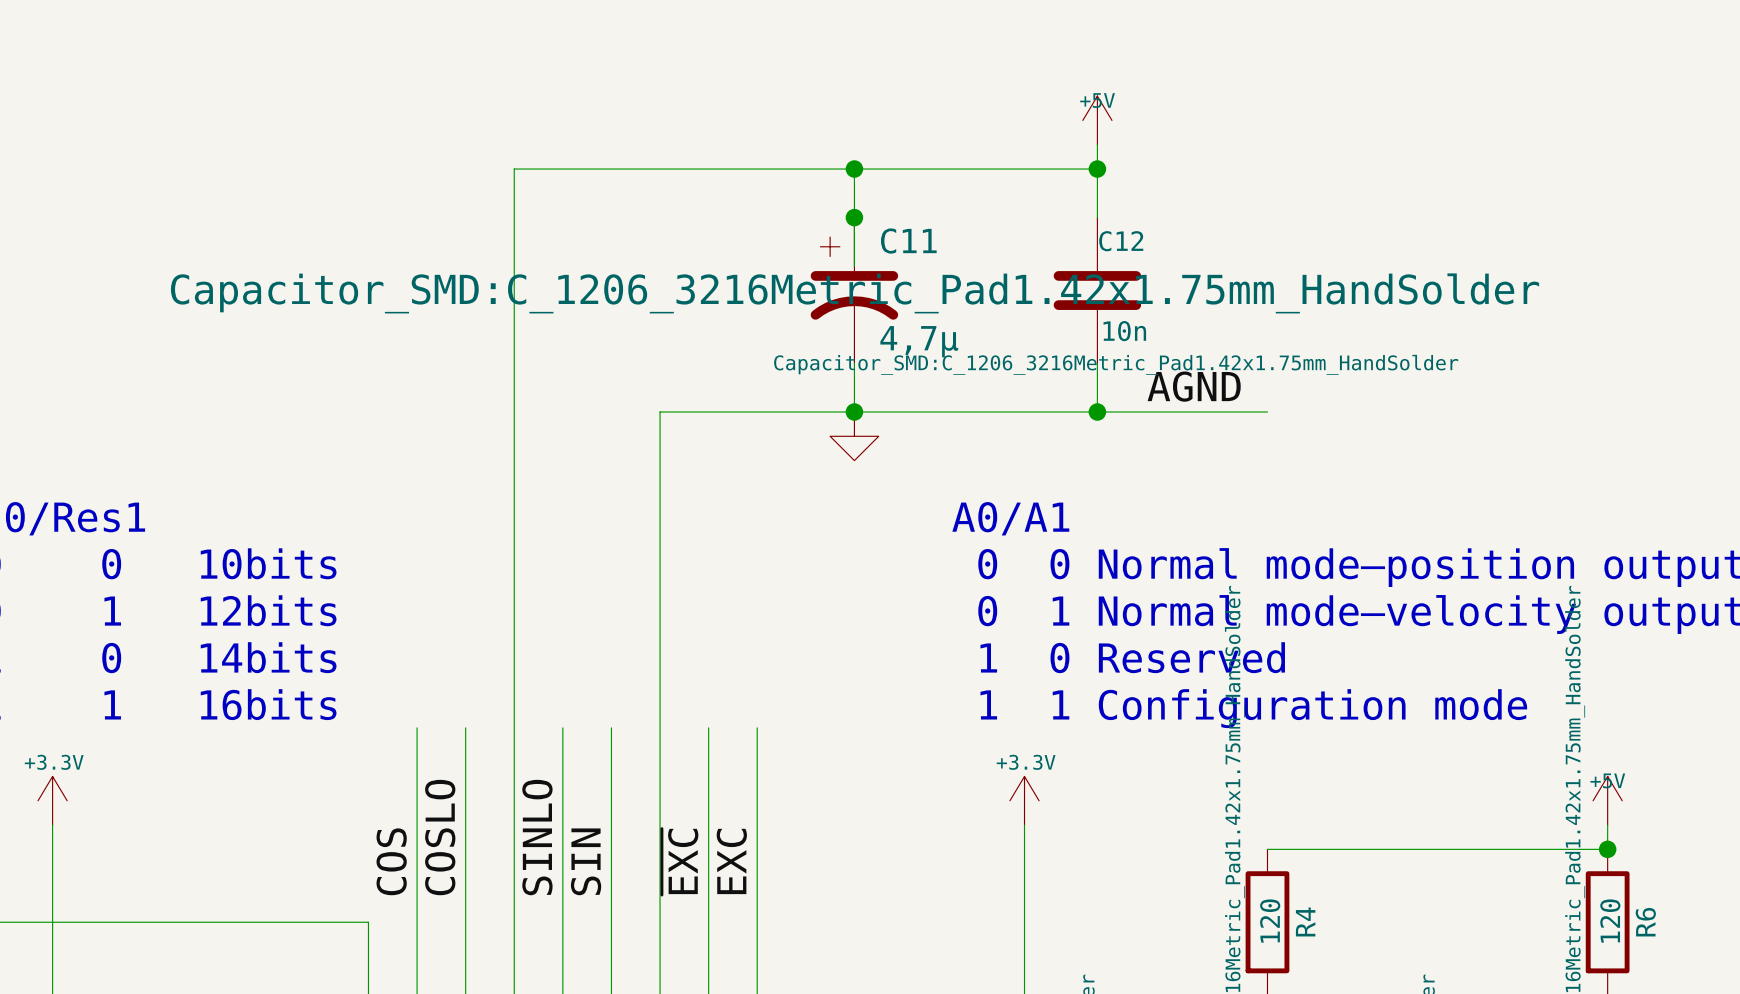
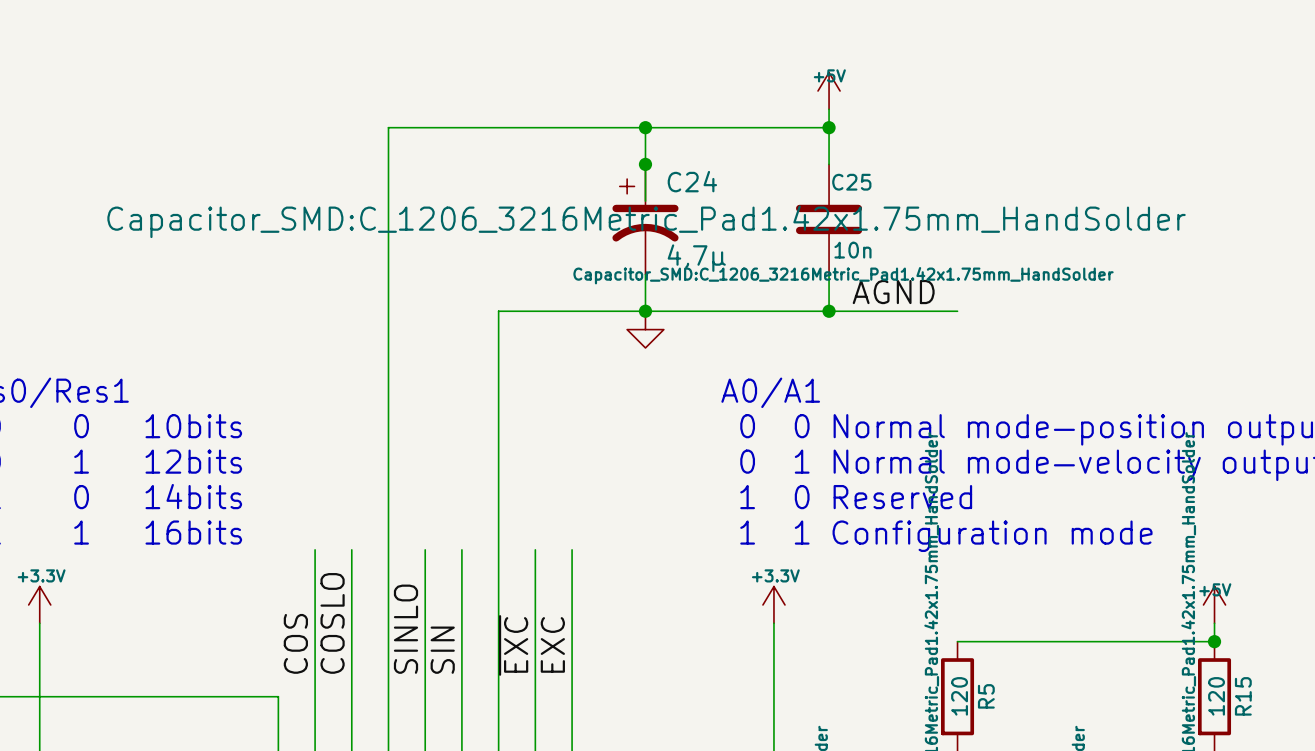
C11 name: C11 (908, 241) -> C24 (692, 181)
C12 name: C12 (1121, 241) -> C25 (851, 182)
R4 name: R4 (1305, 921) -> R5 (986, 696)
R6 name: R6 (1645, 922) -> R15 (1243, 696)

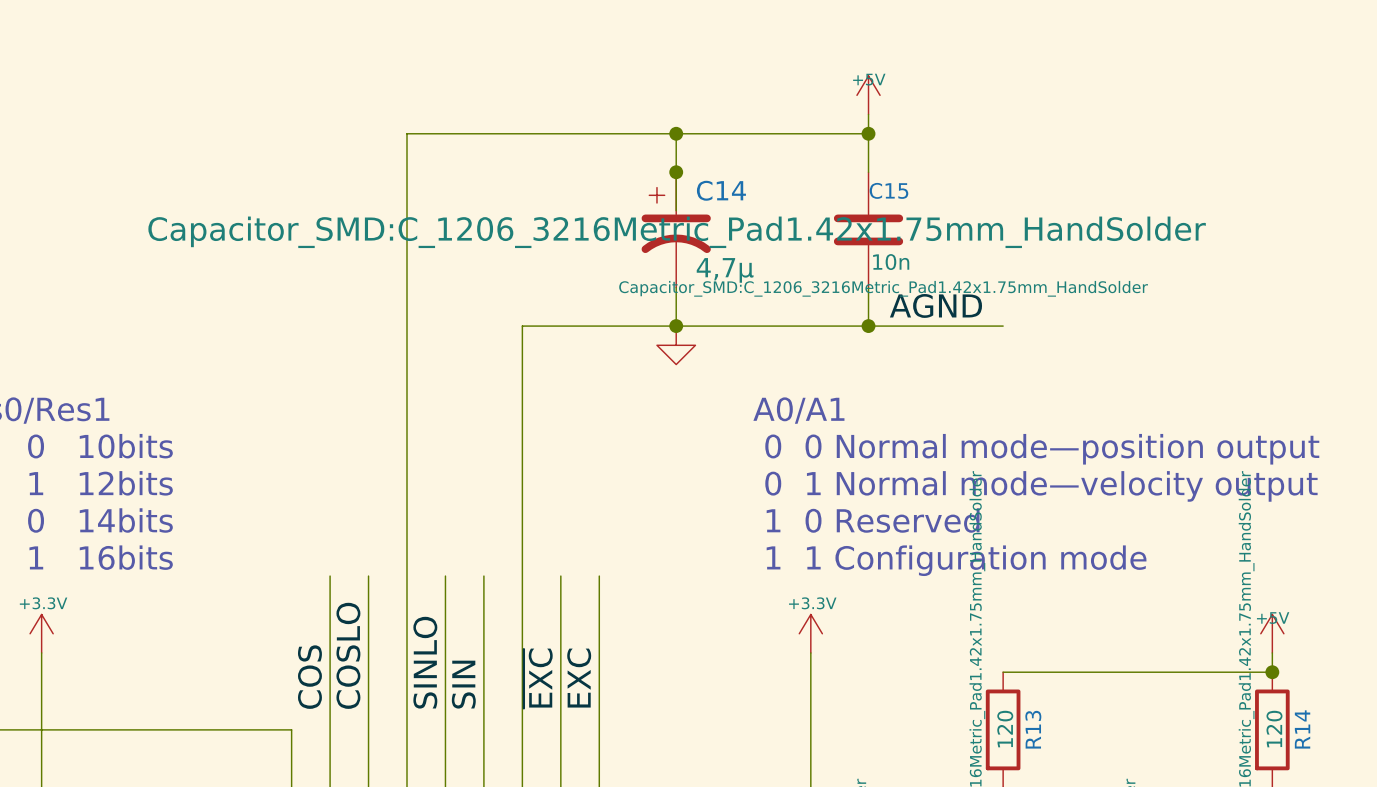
C24 name: C24 (692, 181) -> C14 (721, 190)
C25 name: C25 (851, 182) -> C15 (888, 190)
R5 name: R5 (986, 696) -> R13 (1033, 729)
R15 name: R15 (1243, 696) -> R14 (1302, 729)

